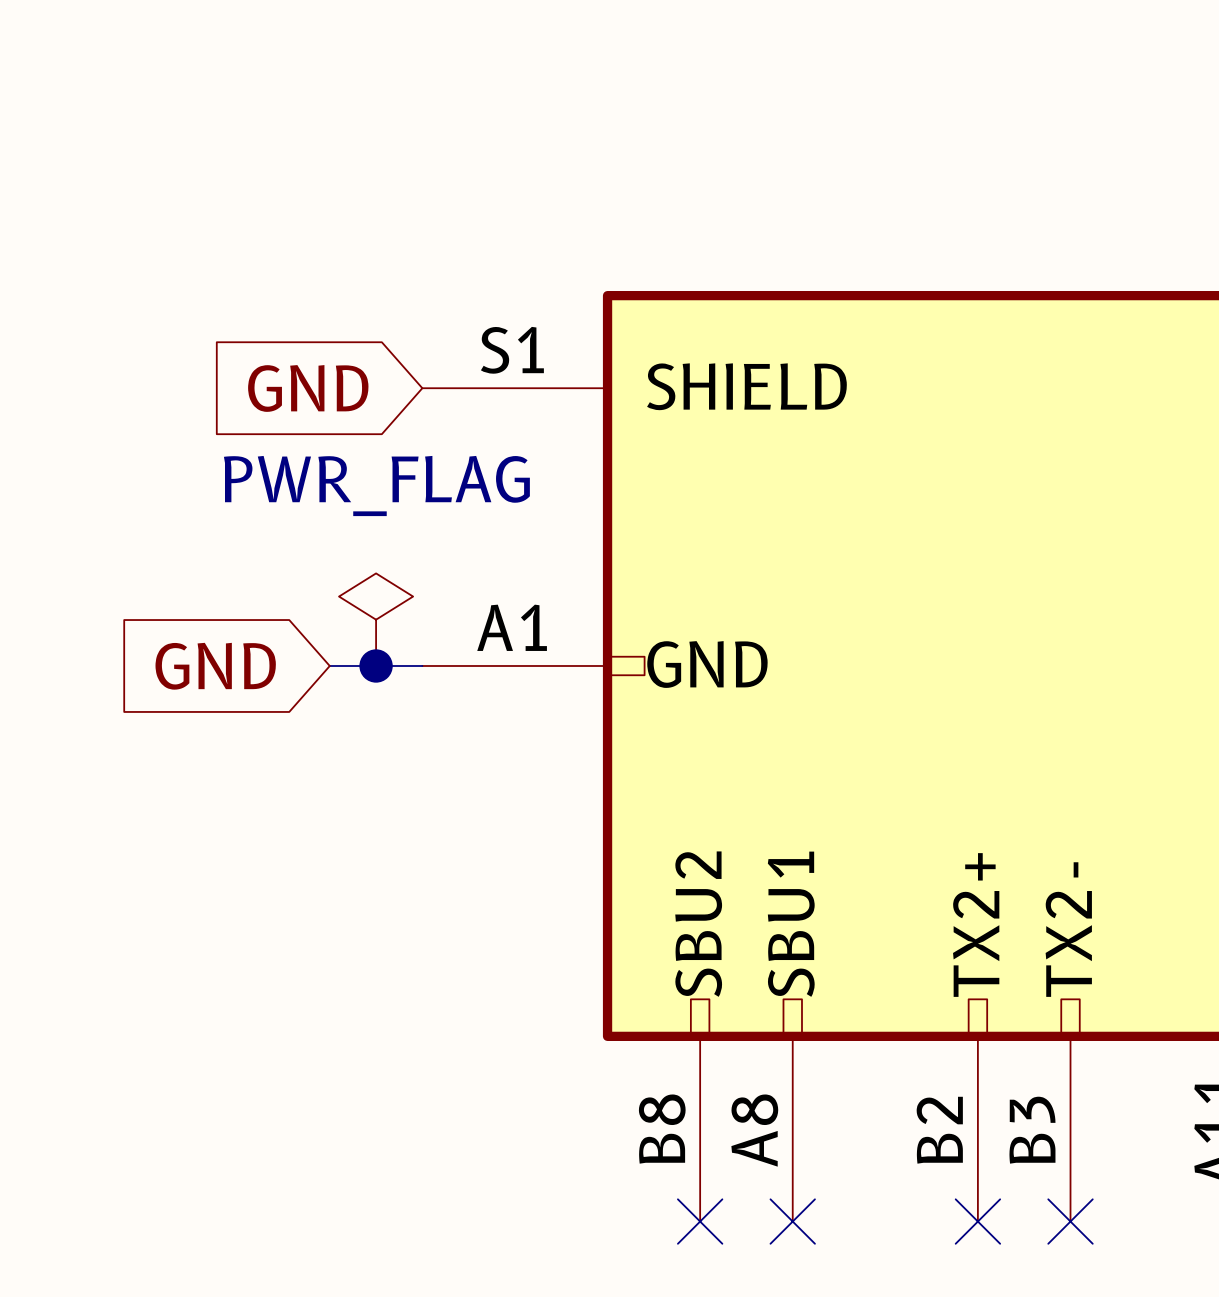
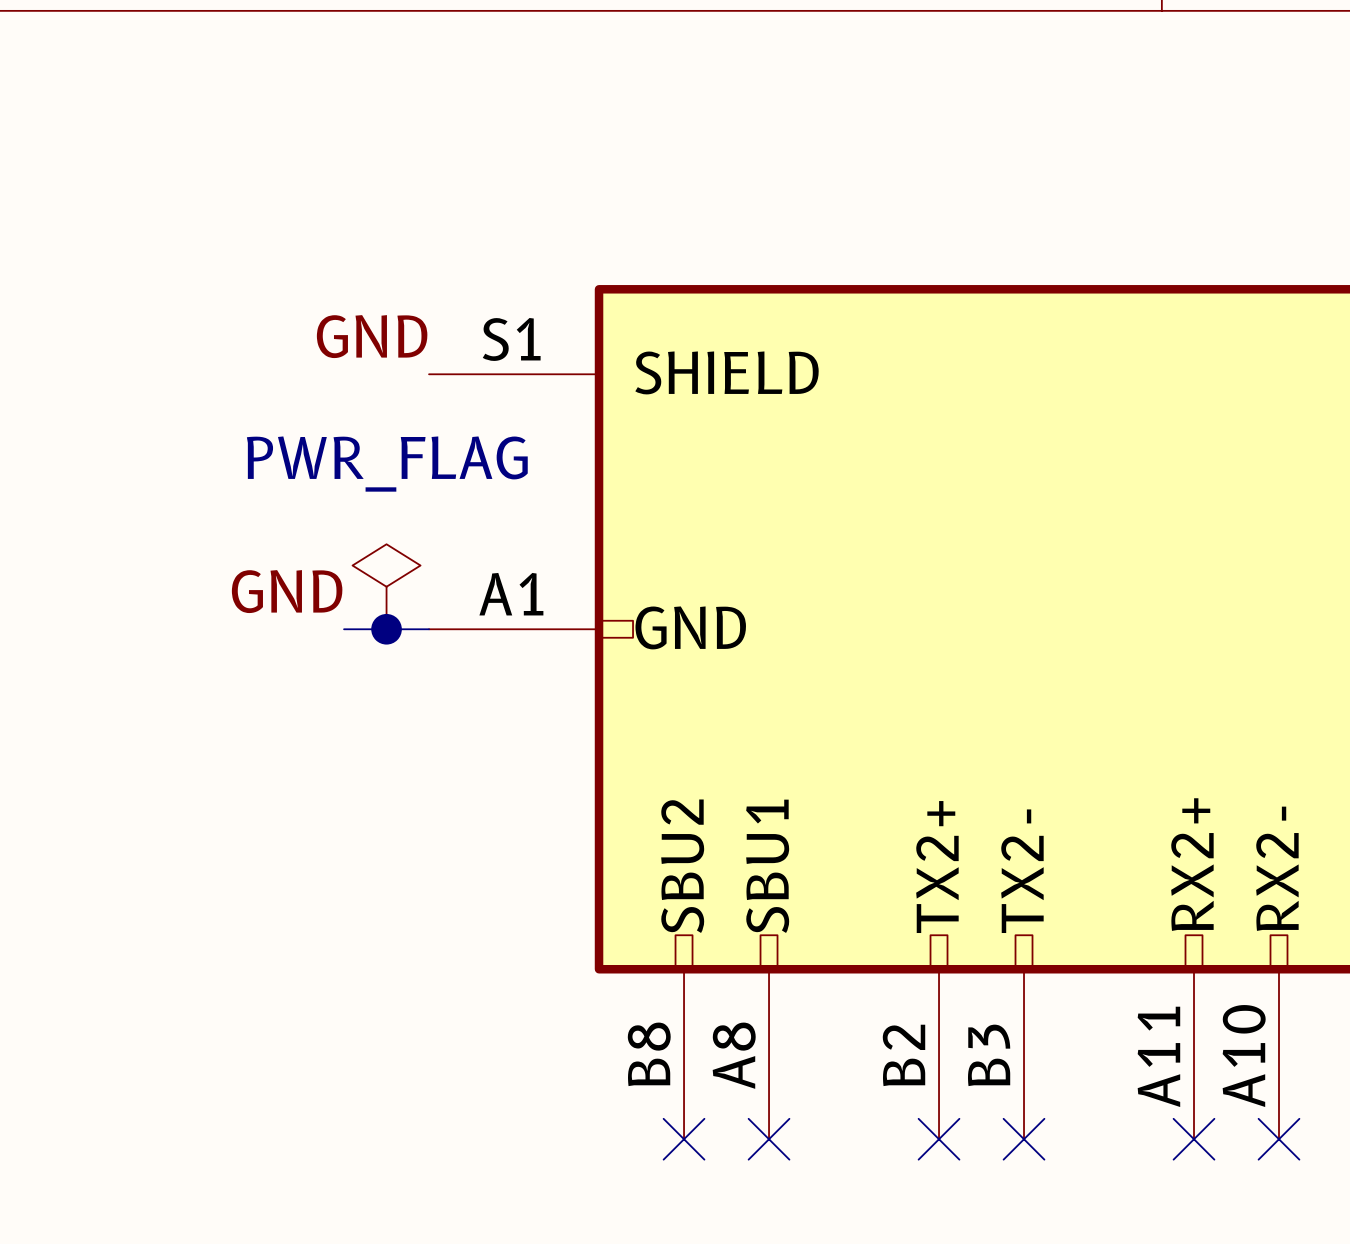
label: none -> GND (372, 336)
global label: GND (308, 388) -> none
label: none -> GND (287, 591)
global label: GND (215, 666) -> none

